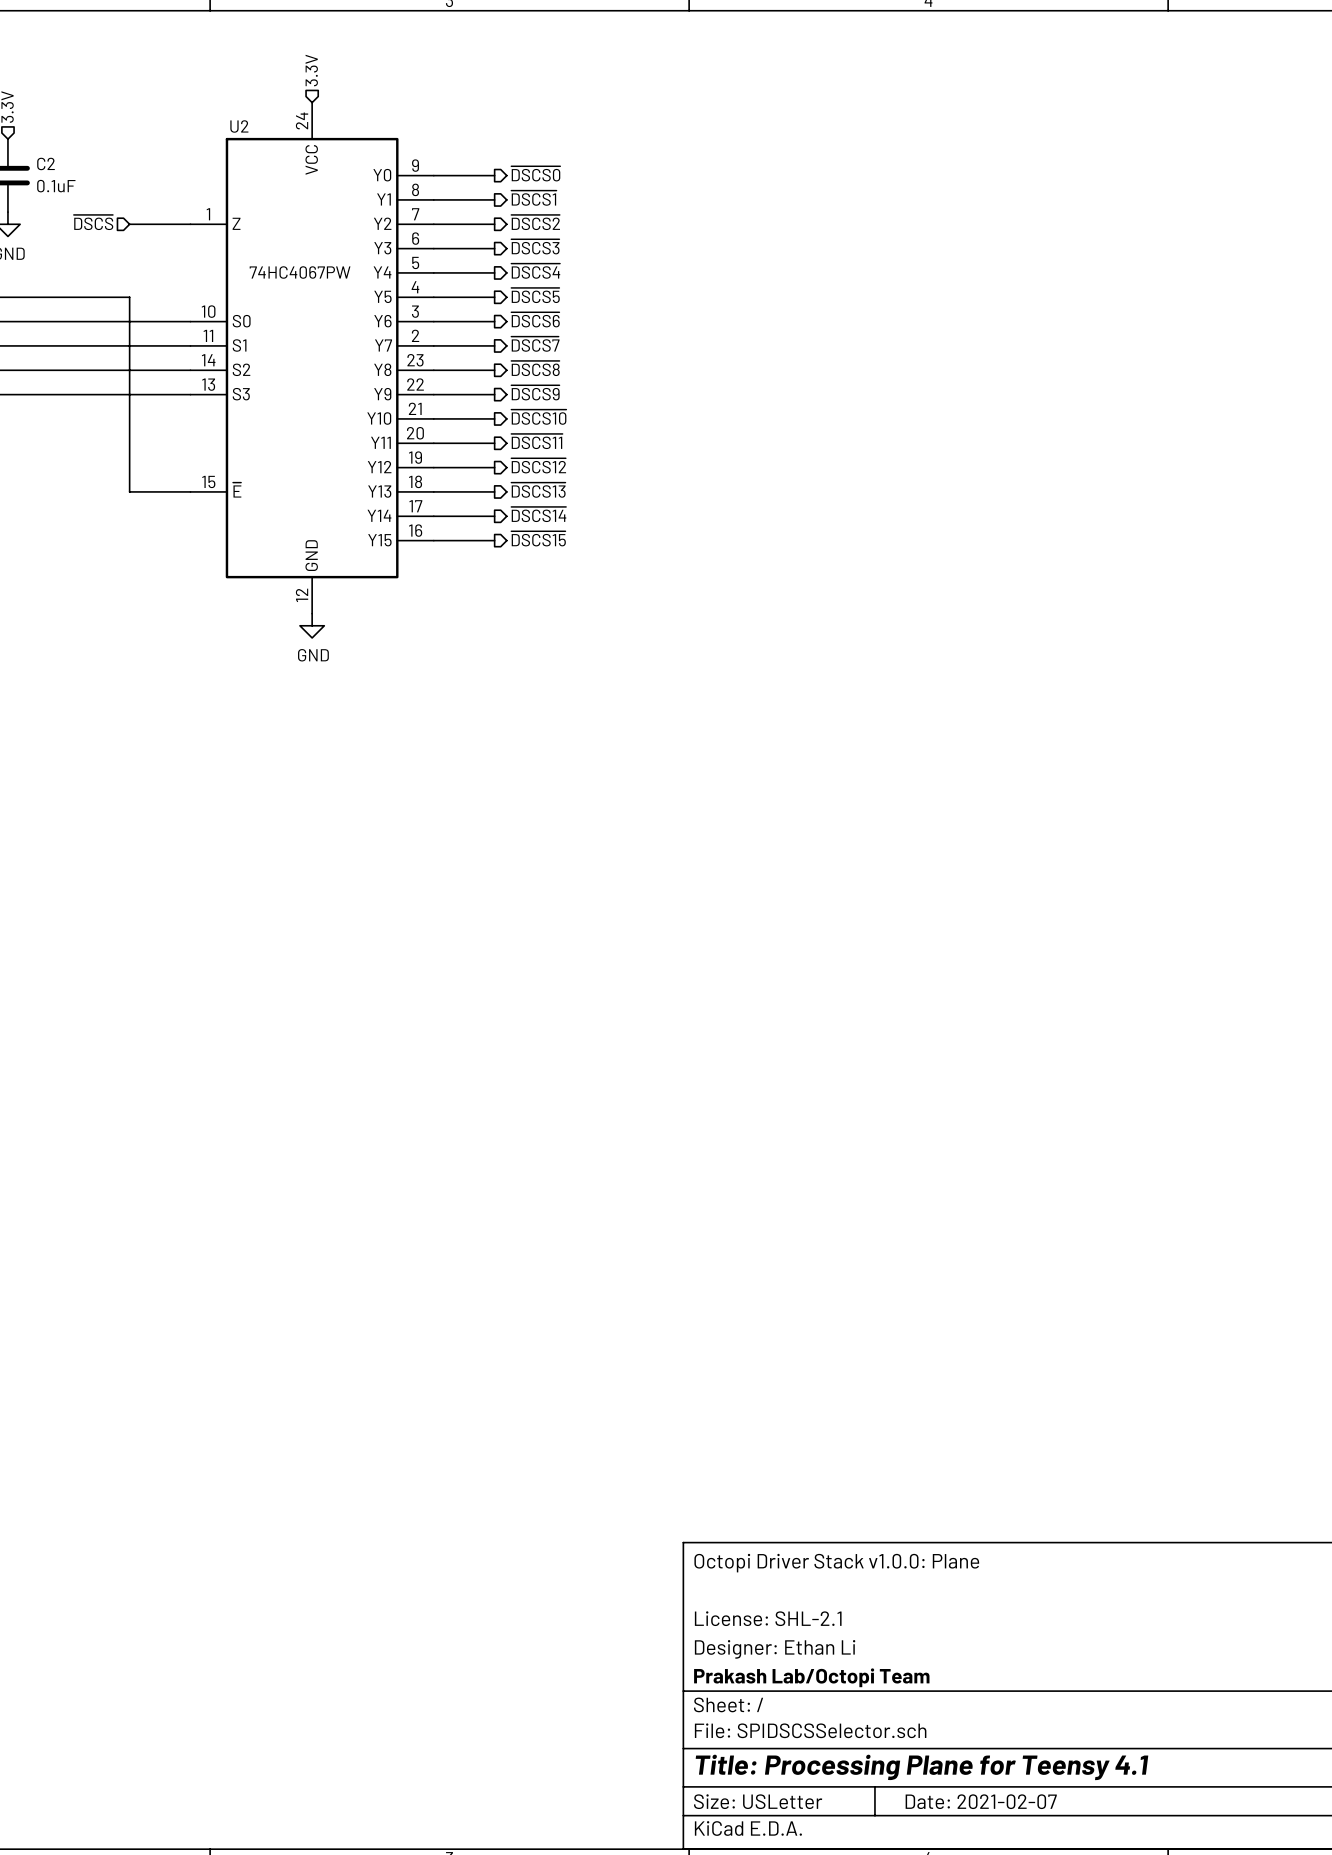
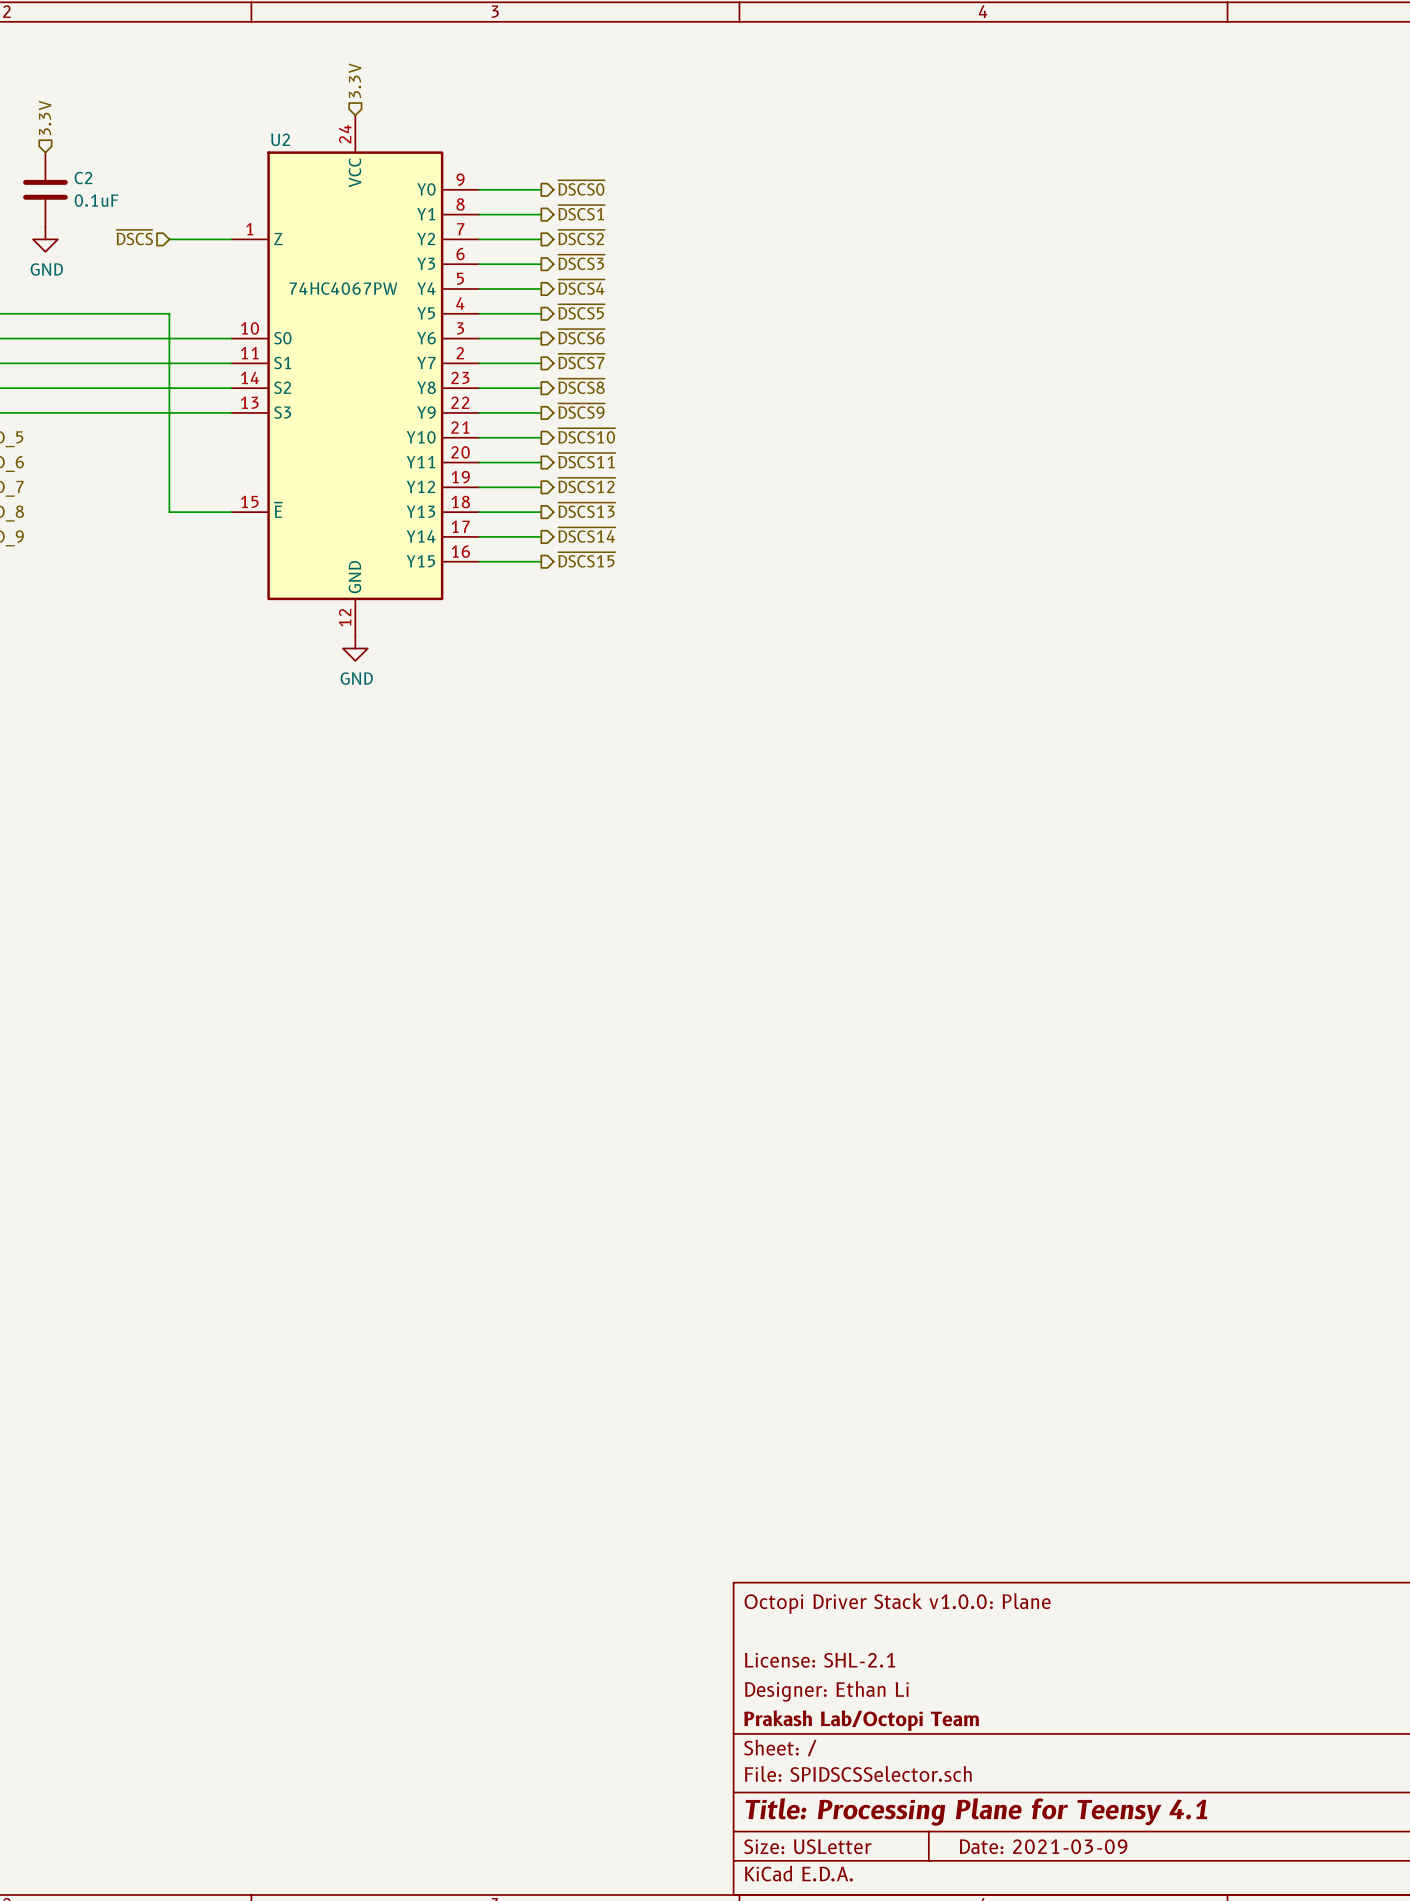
title block: Date: 2021-02-07 (981, 1801) -> Date: 2021-03-09 (1043, 1846)

